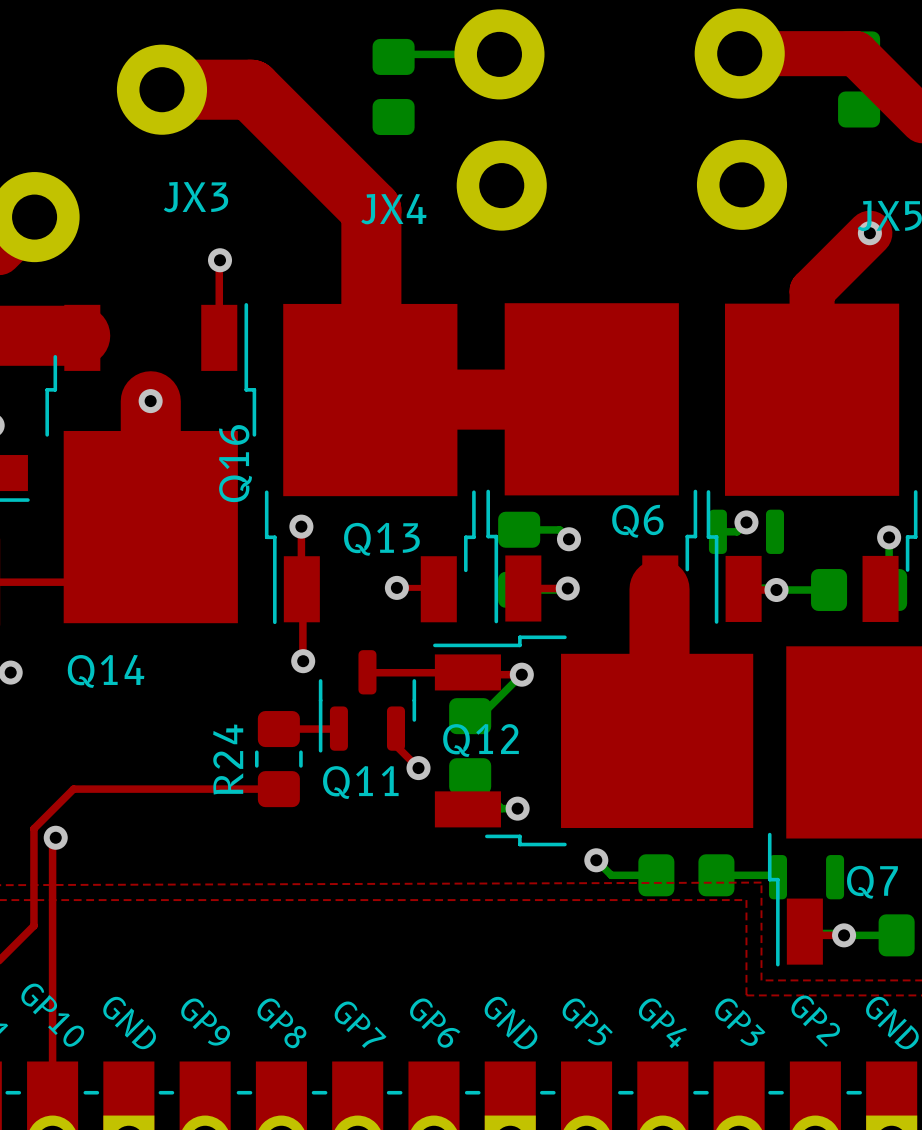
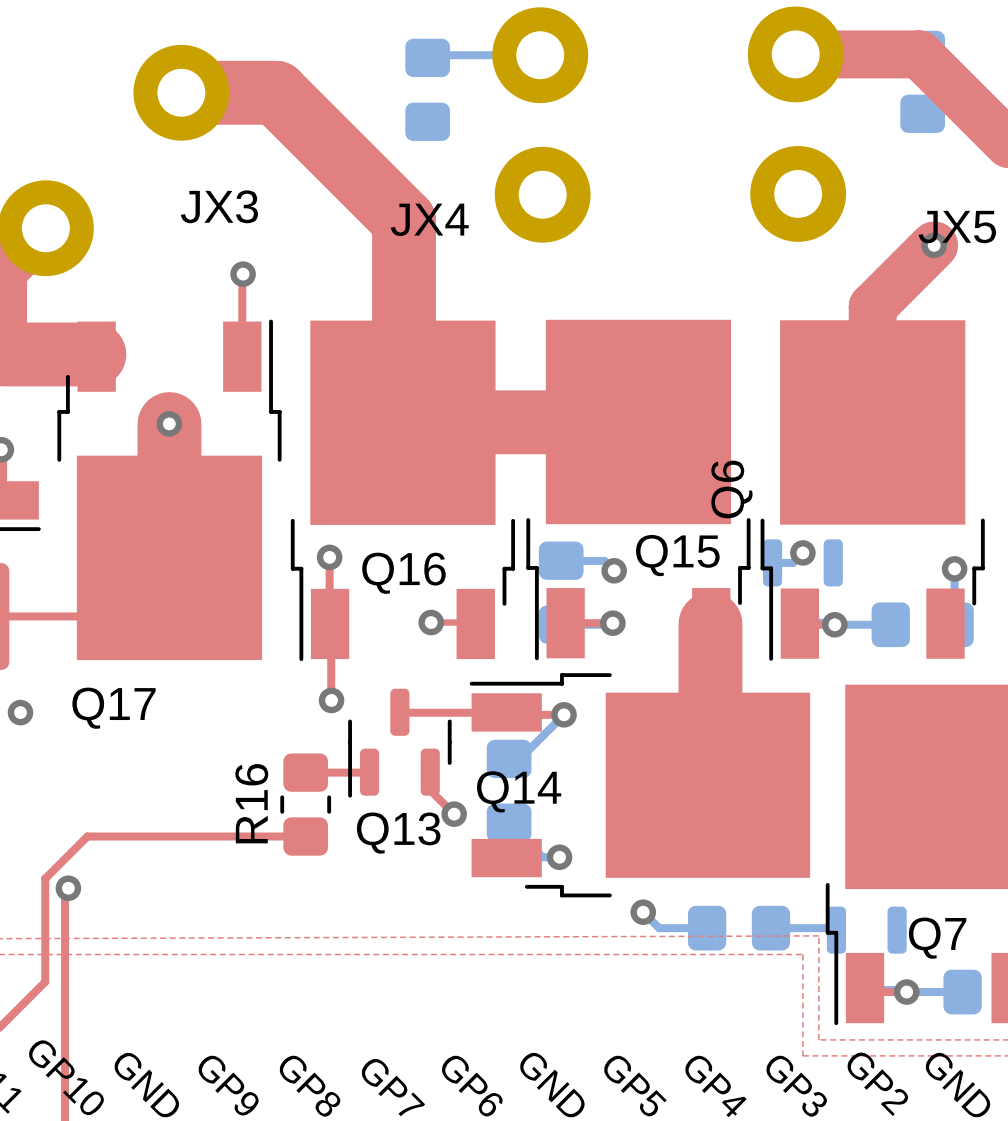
Q16 name rotation: 0° (235, 463) -> 90° clockwise (403, 573)
Q16 name position: Q16 (235, 463) -> Q16 (403, 573)
Q6 name rotation: 0° (637, 521) -> 90° counterclockwise (731, 489)
Q13 name: Q13 (381, 539) -> Q15 (677, 555)
Q14 name: Q14 (106, 671) -> Q17 (114, 708)
Q12 name: Q12 (481, 740) -> Q14 (519, 791)
R24 name: R24 (228, 759) -> R16 (251, 803)
Q11 name: Q11 (360, 782) -> Q13 (398, 833)

